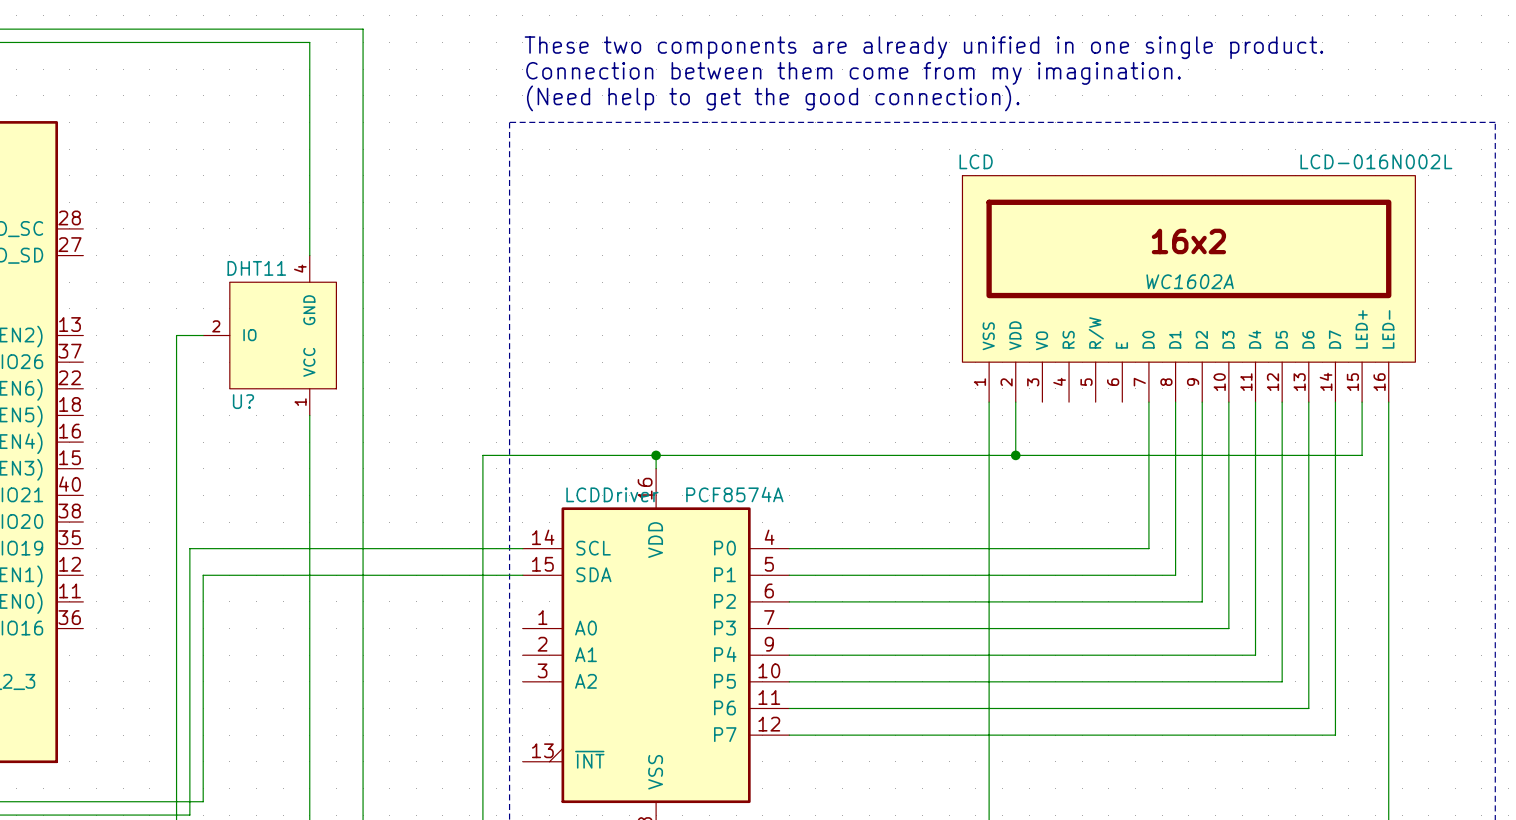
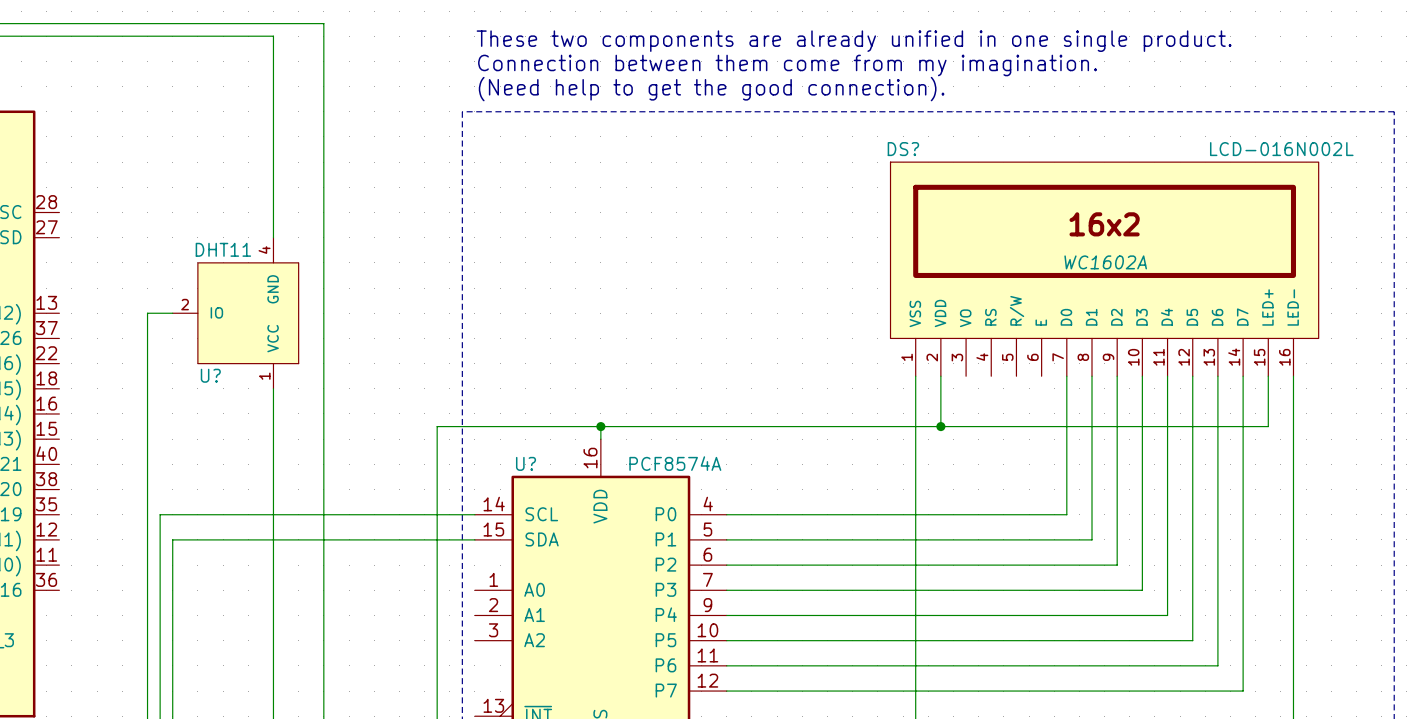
LCD name: LCD (976, 161) -> DS? (903, 149)
LCDDriver name: LCDDriver (612, 494) -> U? (526, 463)

